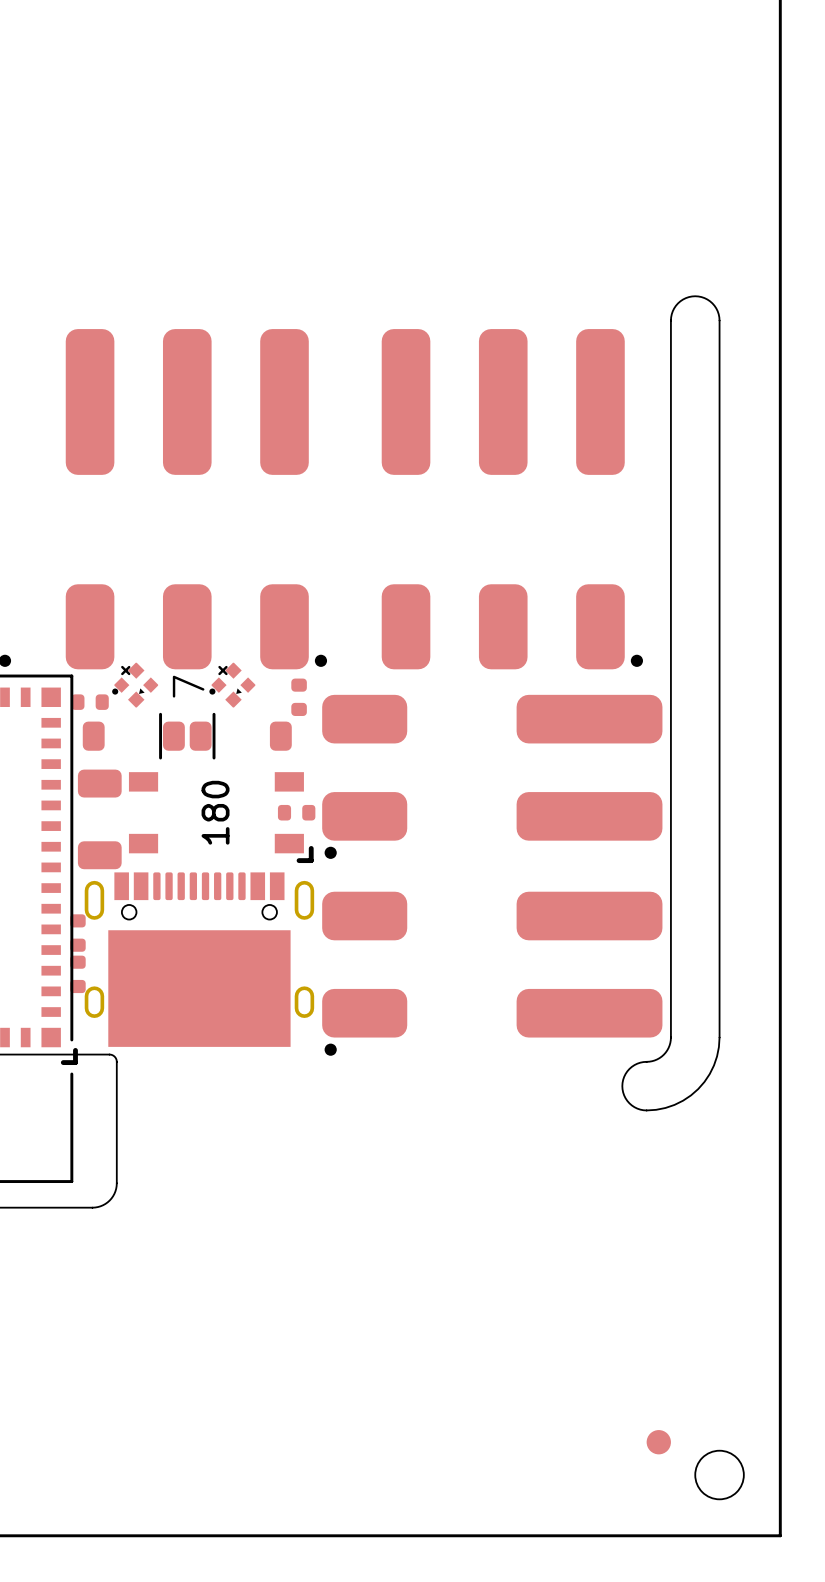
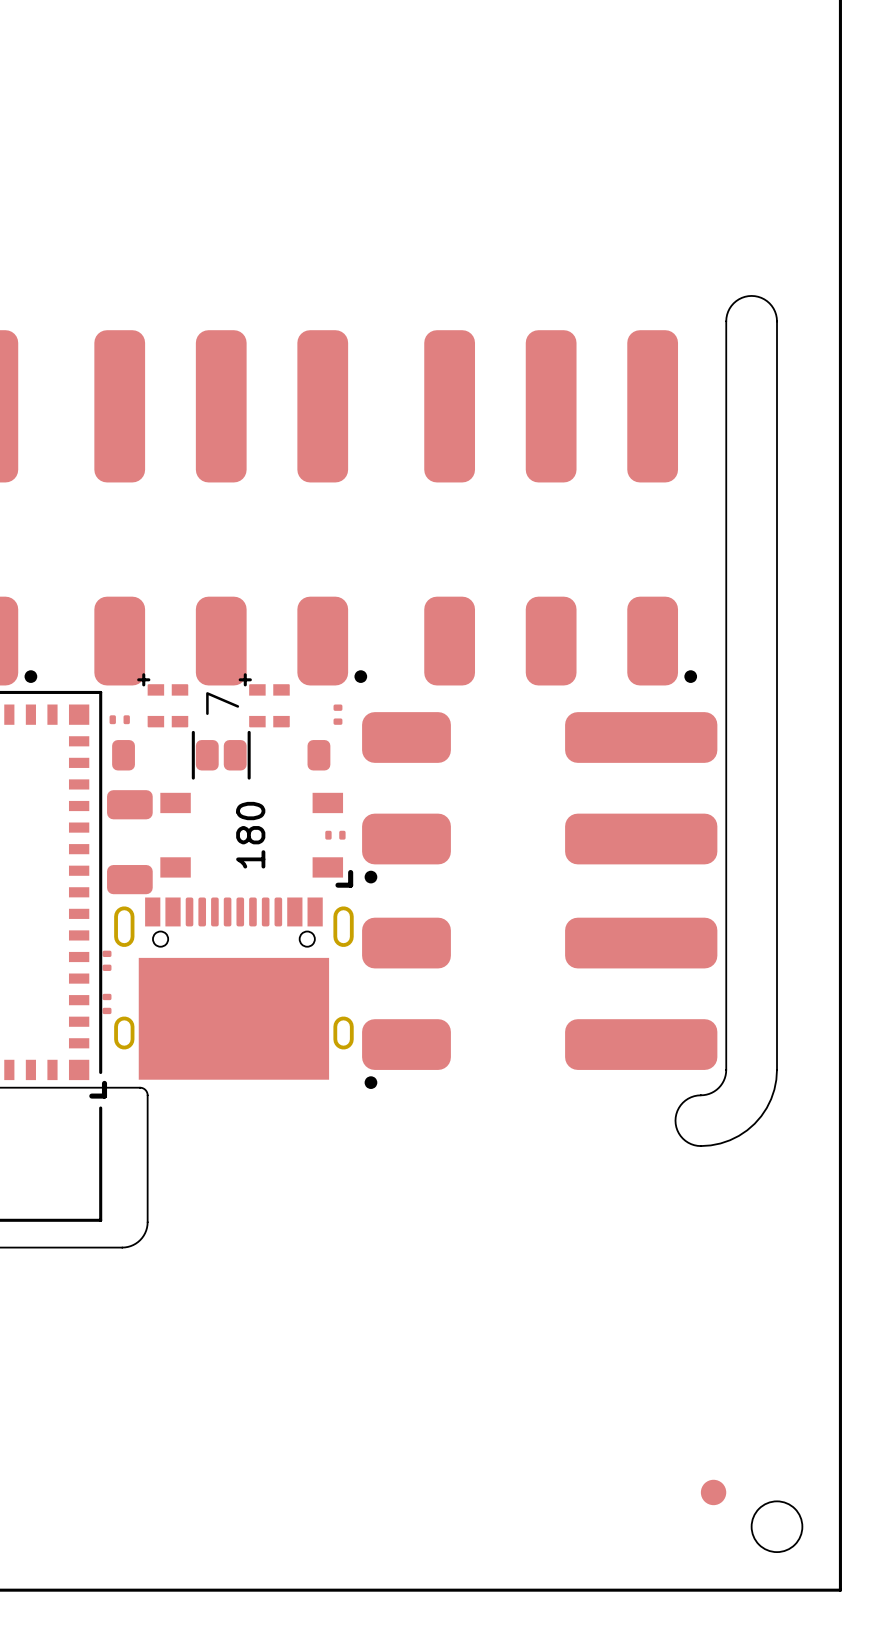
part footprint: [112, 662, 159, 708] -> [137, 673, 189, 728]
part footprint: [209, 662, 256, 708] -> [238, 673, 290, 728]
part footprint: [291, 678, 307, 716] -> [333, 704, 343, 725]
part footprint: [71, 694, 109, 710] -> [109, 715, 130, 725]
part footprint: [277, 804, 316, 821] -> [325, 830, 346, 840]
part footprint: [70, 914, 86, 952] -> [102, 950, 112, 971]
part footprint: [70, 955, 86, 994] -> [102, 993, 112, 1015]

